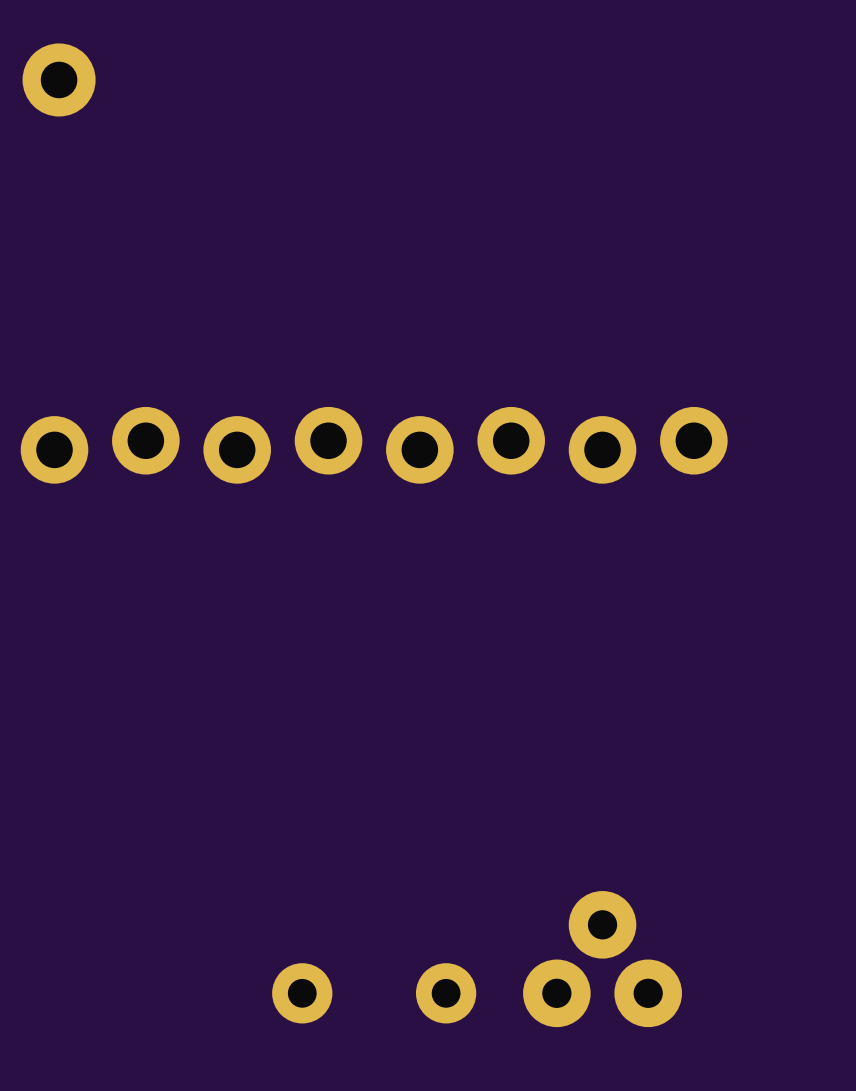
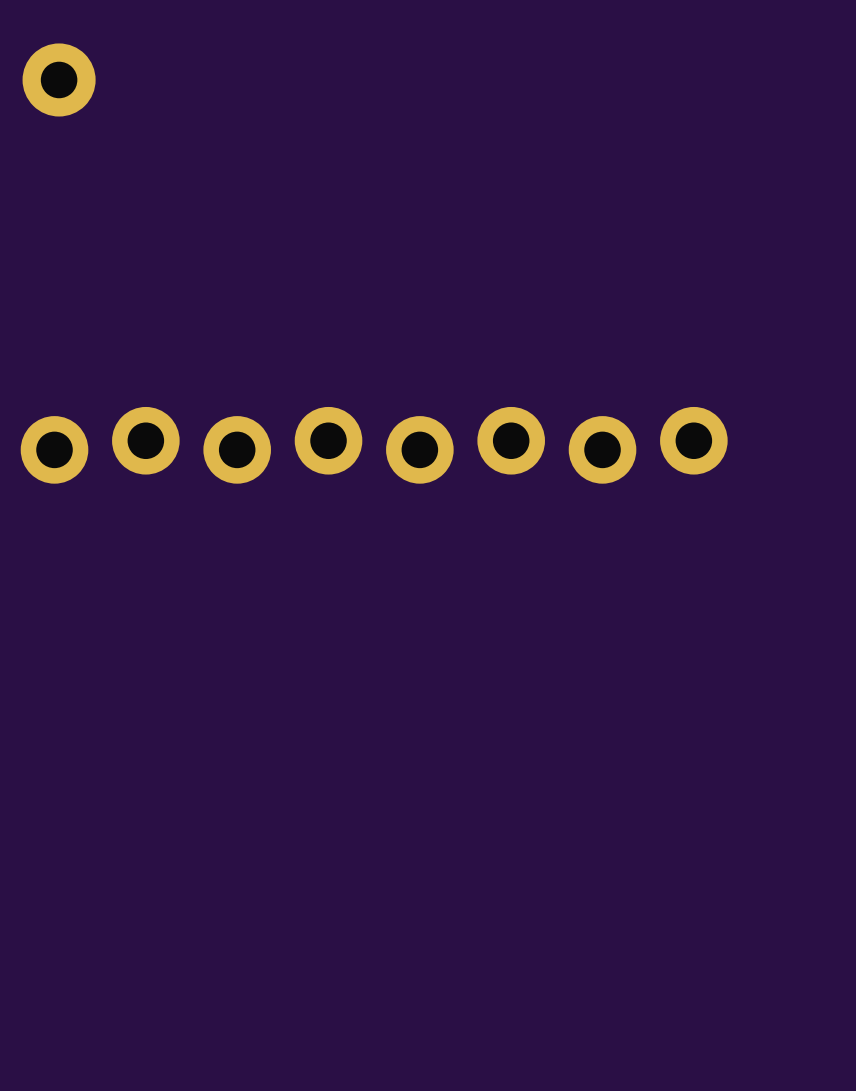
part: (602, 959) -> none
part: (374, 993) -> none

